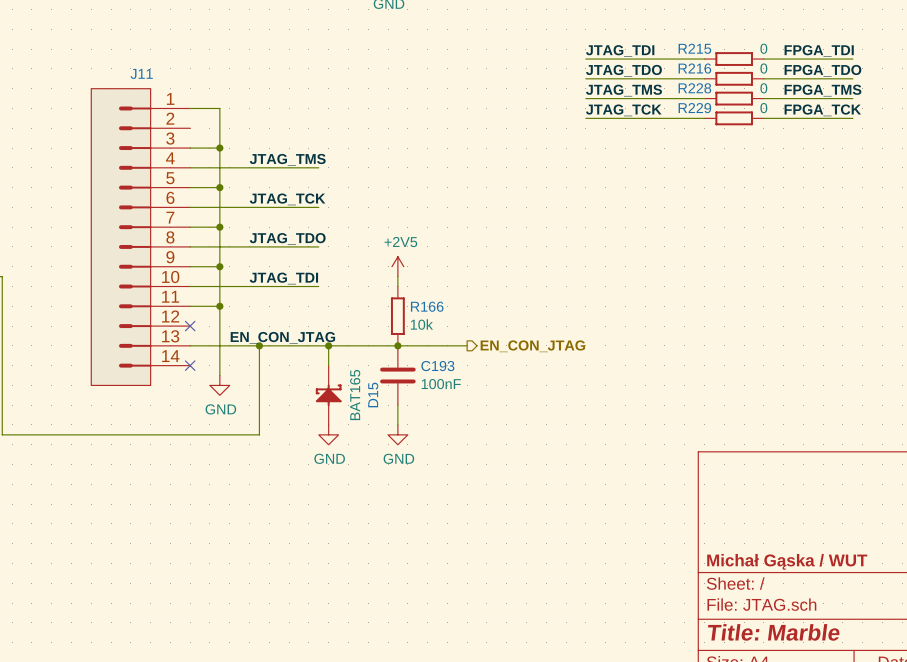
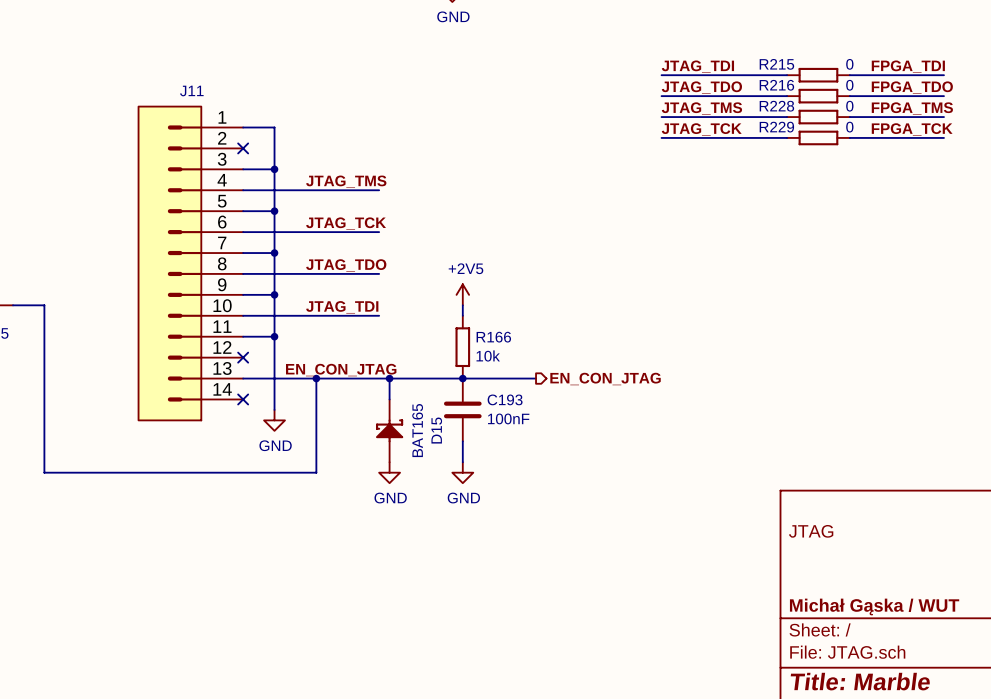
no-connect mark: none -> (243, 148)
title block: none -> JTAG (811, 531)

